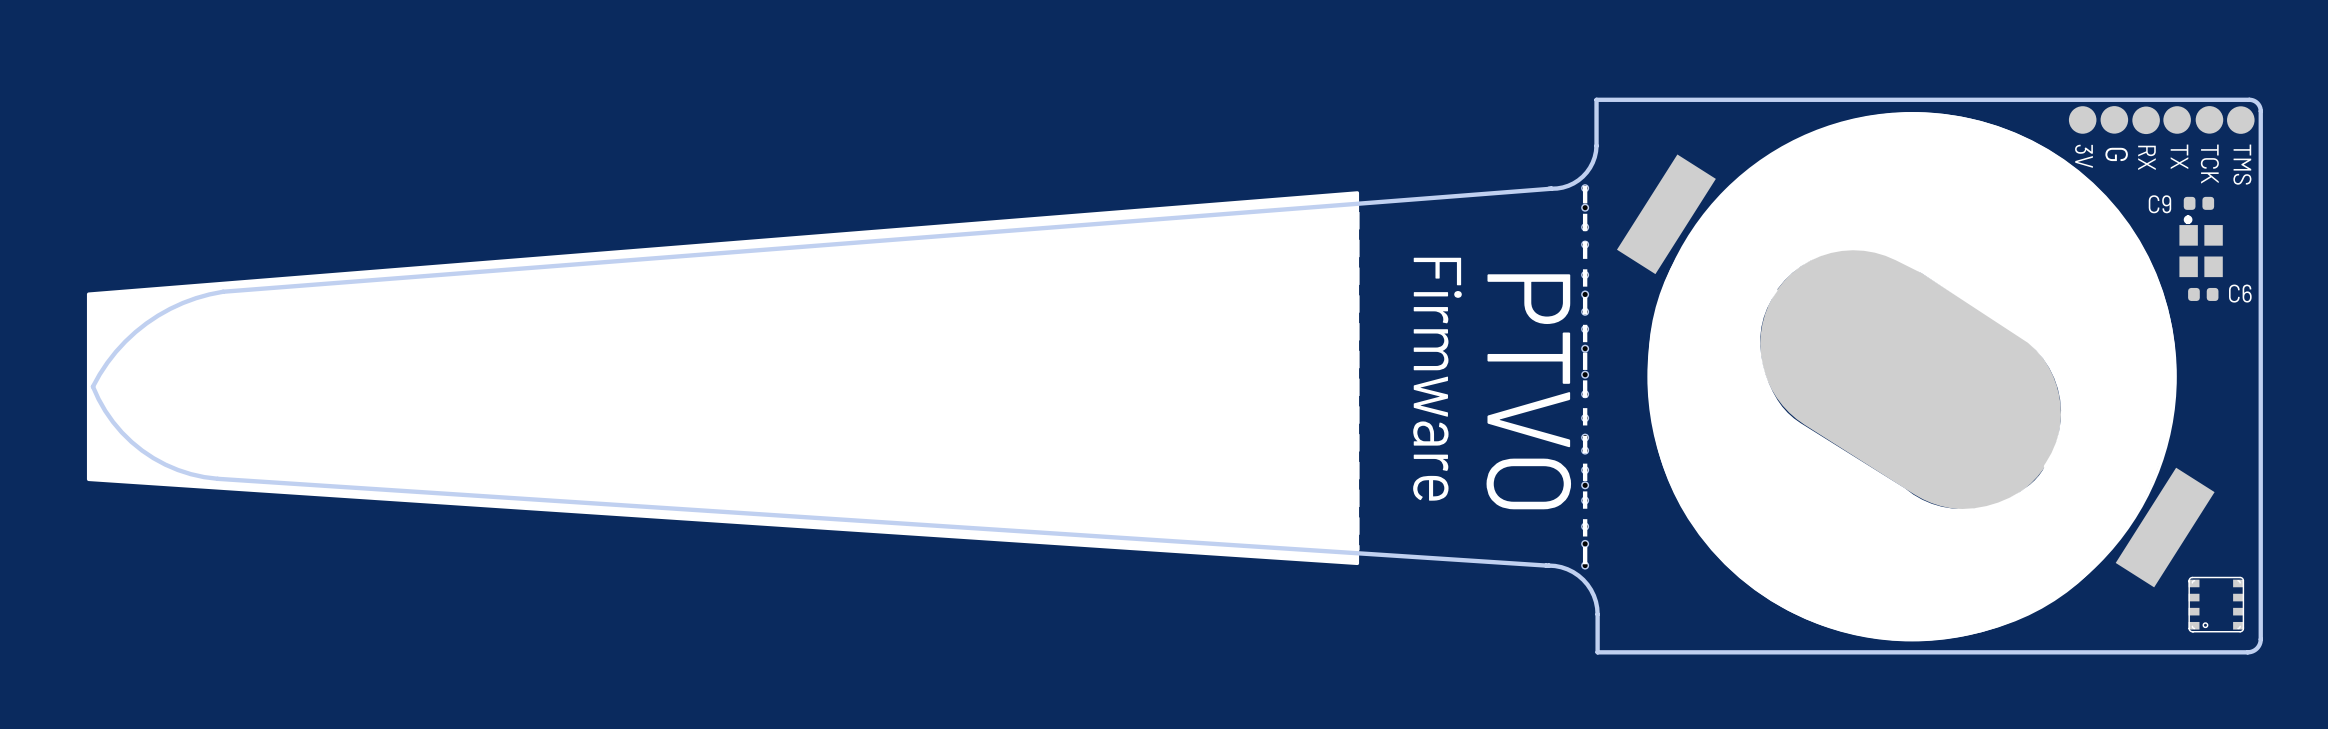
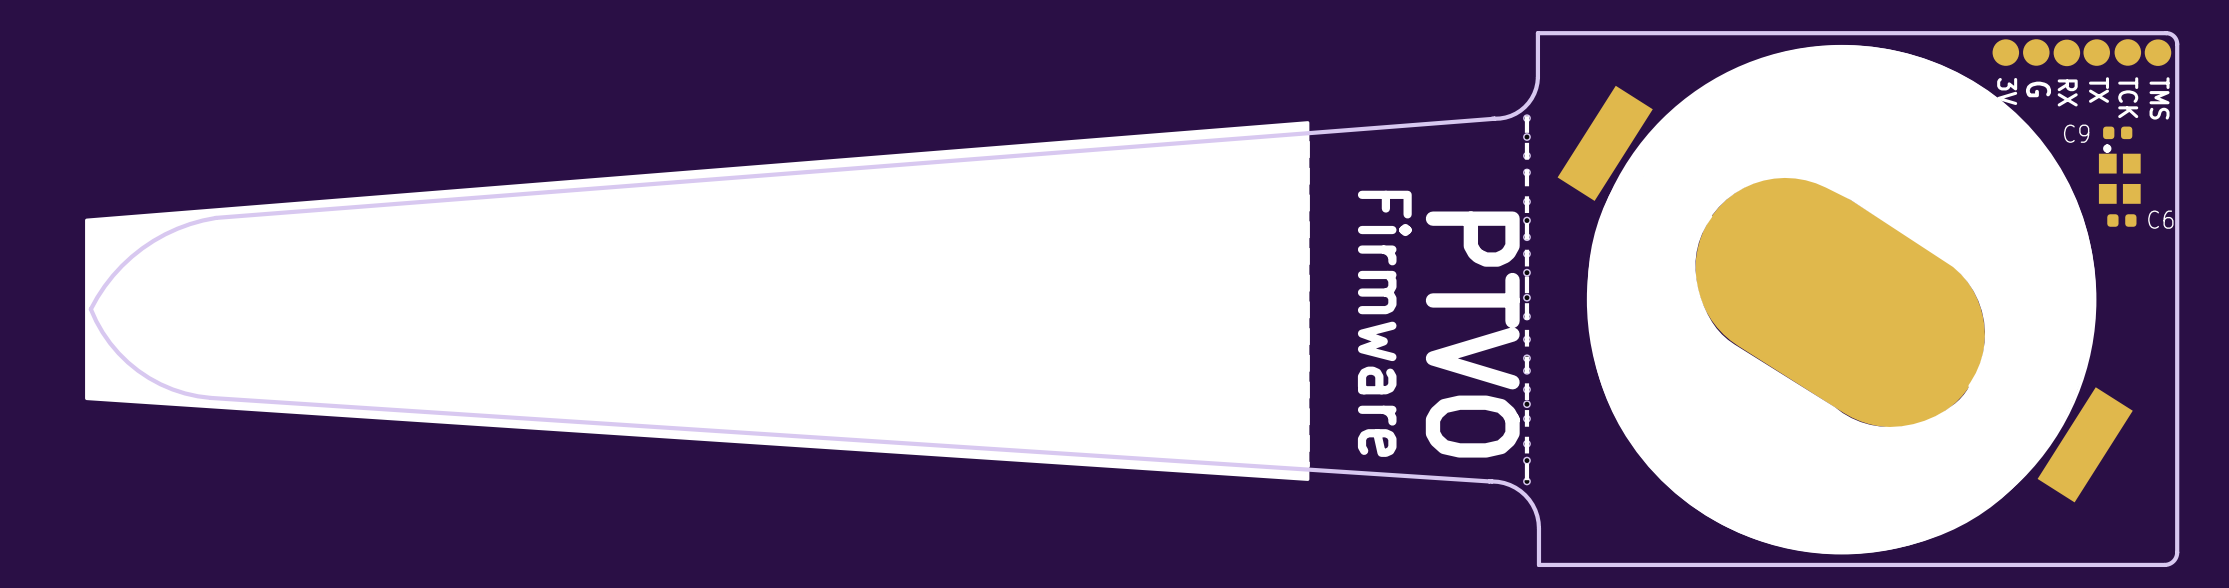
part: (2216, 604) -> none

